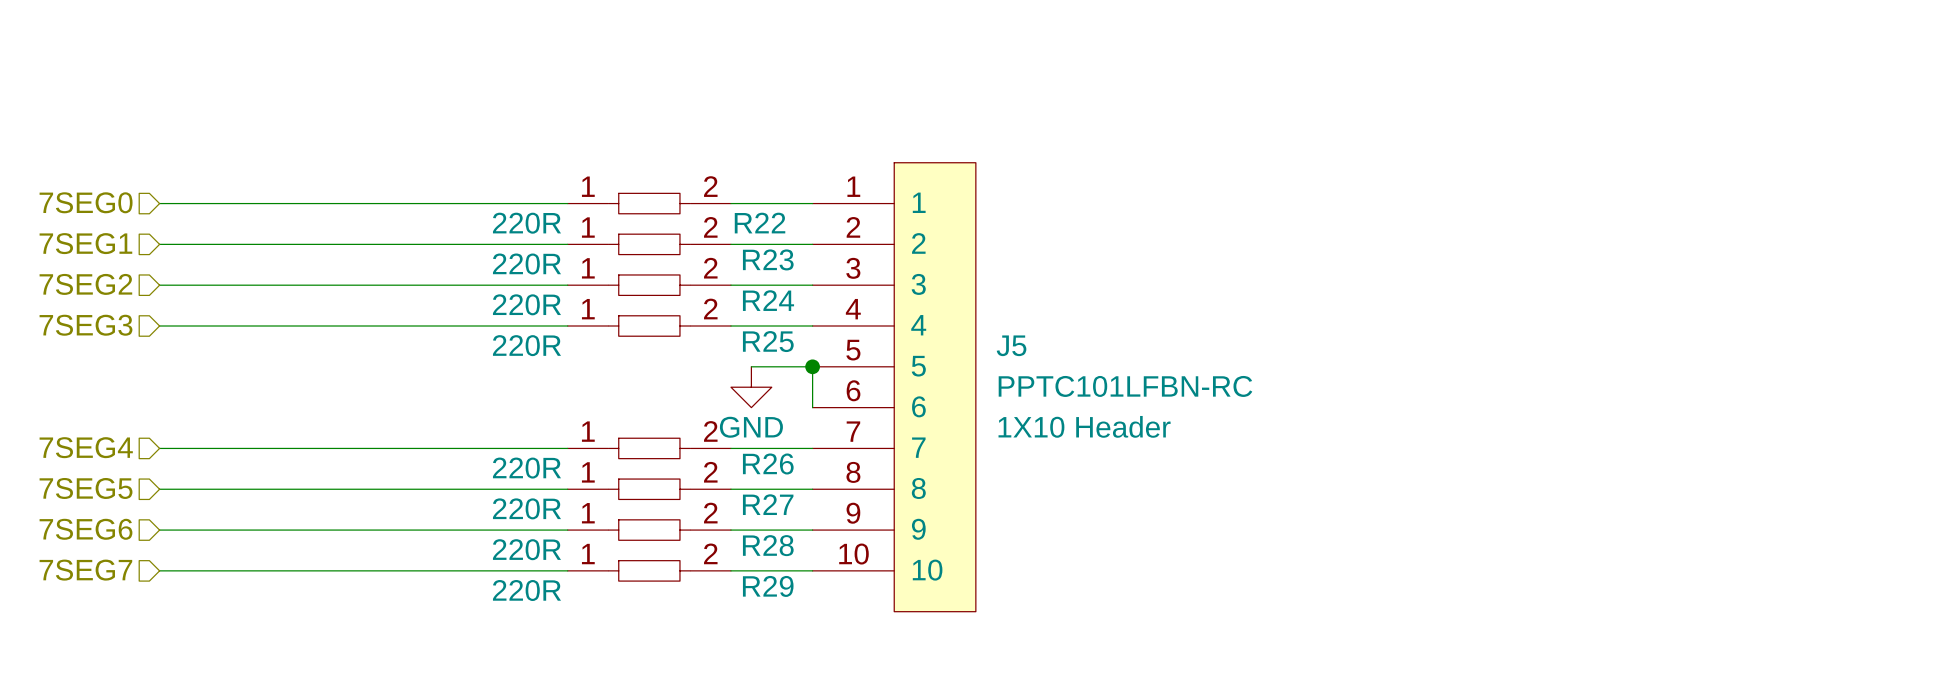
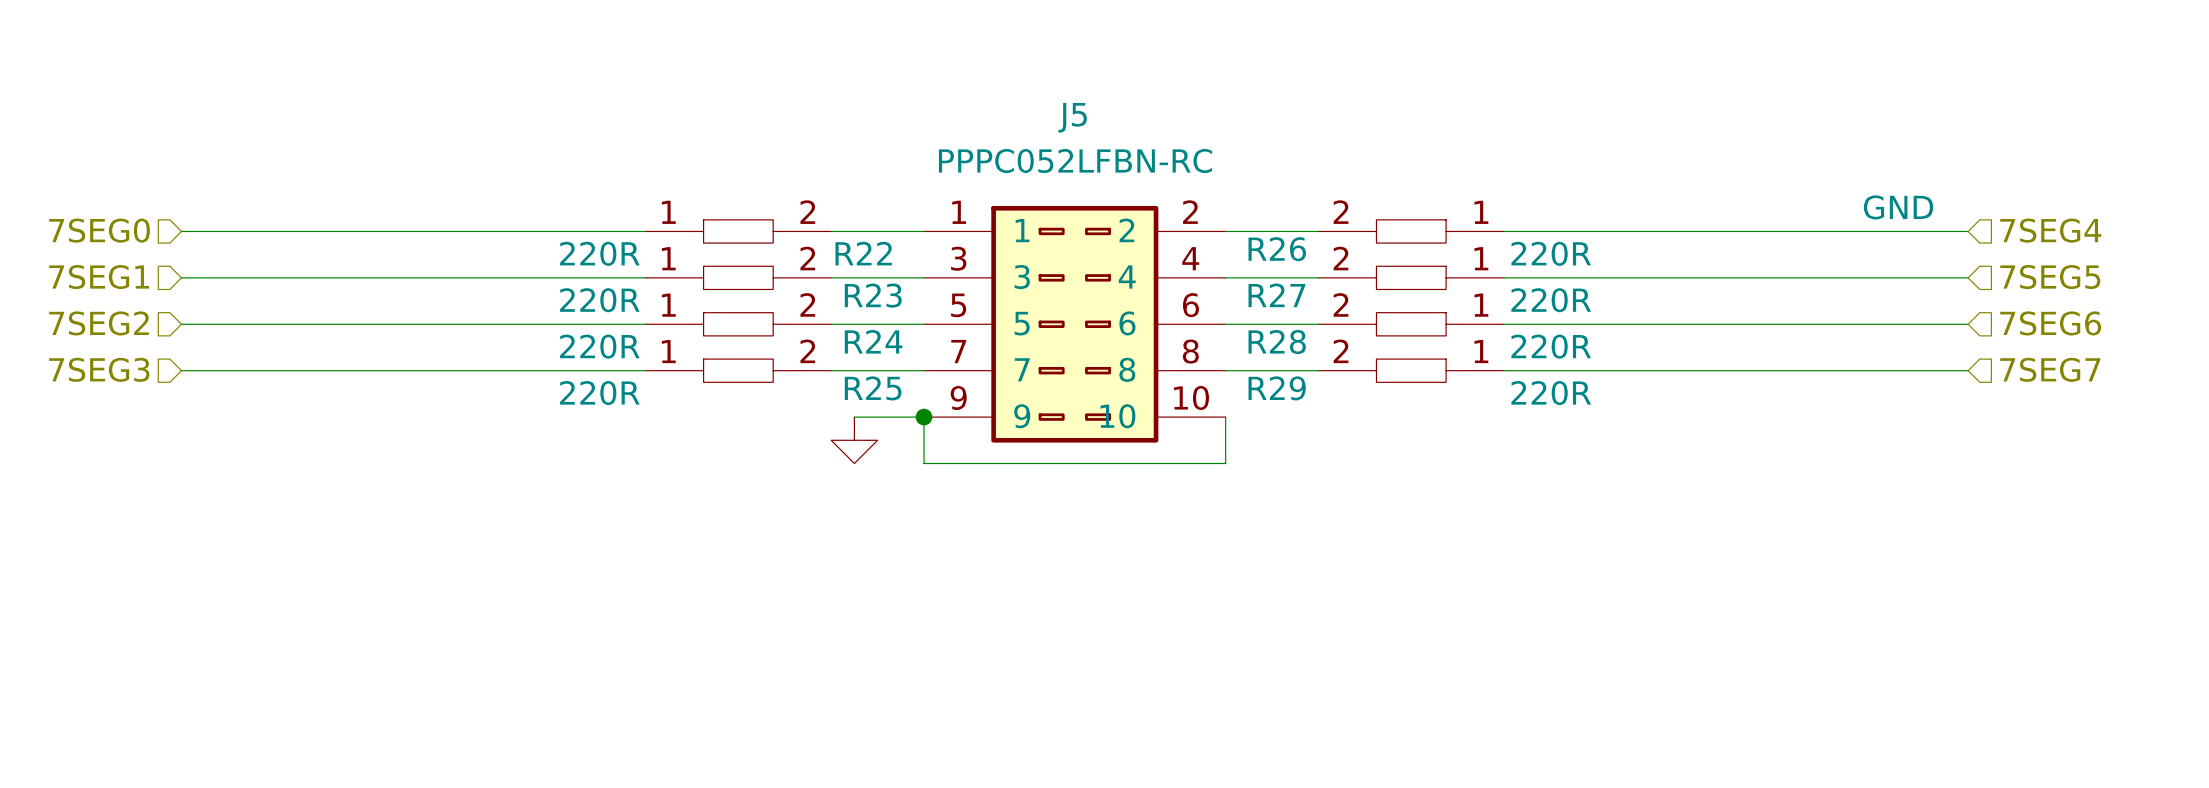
J5 symbol: [812, 162, 976, 612] -> [924, 205, 1226, 443]
hierarchical label: none -> 7SEG4 (2050, 230)
wire: none -> (1225, 231) (1318, 231)
wire: none -> (1504, 231) (1968, 231)
hierarchical label: none -> 7SEG5 (2050, 277)
wire: none -> (1225, 277) (1318, 277)
wire: none -> (1504, 277) (1968, 277)
hierarchical label: none -> 7SEG6 (2050, 323)
wire: none -> (1504, 324) (1968, 324)
hierarchical label: none -> 7SEG7 (2050, 369)
wire: none -> (1504, 370) (1968, 370)
J5 name position: J5 (1011, 345) -> J5 (1072, 117)
wire: none -> (1225, 417) (1225, 463) (924, 463)
J5 value: PPTC101LFBN-RC (1125, 386) -> PPPC052LFBN-RC (1075, 161)
J5 text: 1X10 Header (1084, 426) -> none
power symbol text position: GND (751, 427) -> GND (1898, 207)
hierarchical label: 7SEG4 (86, 447) -> none
wire: (159, 448) (567, 448) -> none
R26 rotation: 0° (649, 448) -> 180° (1411, 231)
R26 position: (649, 448) -> (1411, 231)
wire: (730, 448) (812, 448) -> (1225, 324) (1318, 324)
R26 name position: R26 (768, 463) -> R26 (1277, 249)
R26 text position: 220R (526, 468) -> 220R (1551, 253)
hierarchical label: 7SEG5 (86, 488) -> none
wire: (159, 489) (567, 489) -> none
R27 rotation: 0° (649, 489) -> 180° (1411, 277)
R27 position: (649, 489) -> (1411, 277)
wire: (730, 489) (812, 489) -> (1225, 370) (1318, 370)
R27 name position: R27 (768, 504) -> R27 (1276, 295)
R27 text position: 220R (526, 508) -> 220R (1551, 300)
hierarchical label: 7SEG6 (85, 529) -> none
wire: (159, 530) (567, 530) -> none
R28 rotation: 0° (649, 530) -> 180° (1411, 324)
R28 position: (649, 530) -> (1411, 324)
wire: (730, 530) (812, 530) -> none
R28 name position: R28 (768, 545) -> R28 (1277, 341)
R28 text position: 220R (526, 549) -> 220R (1551, 346)
hierarchical label: 7SEG7 (85, 570) -> none
wire: (159, 570) (567, 570) -> none
R29 rotation: 0° (649, 570) -> 180° (1411, 370)
R29 position: (649, 570) -> (1411, 370)
wire: (730, 570) (812, 570) -> none
R29 name position: R29 (768, 586) -> R29 (1277, 388)
R29 text position: 220R (526, 590) -> 220R (1551, 393)

